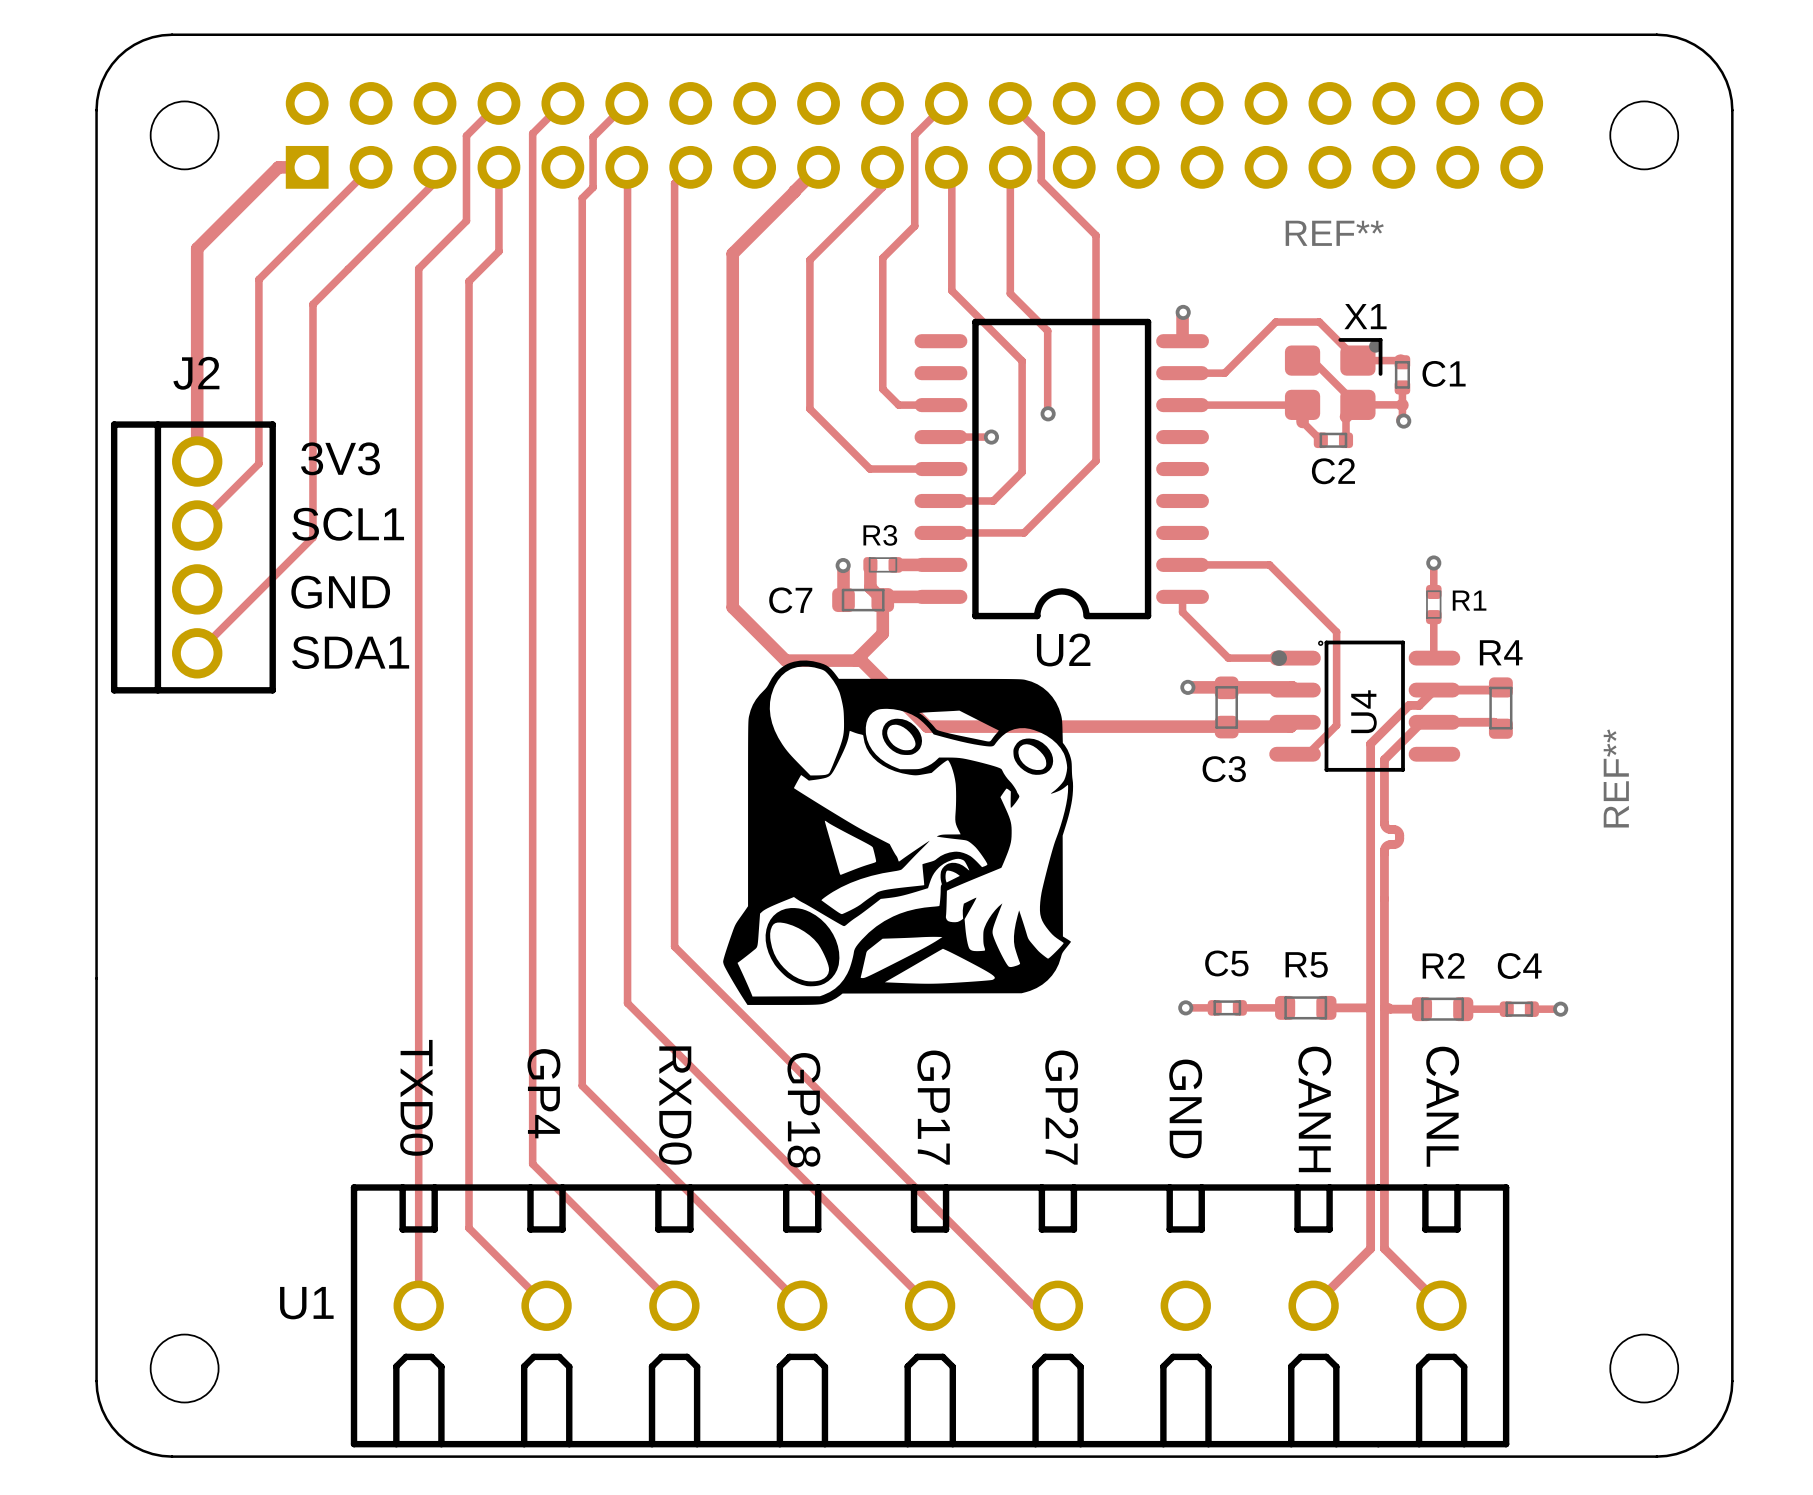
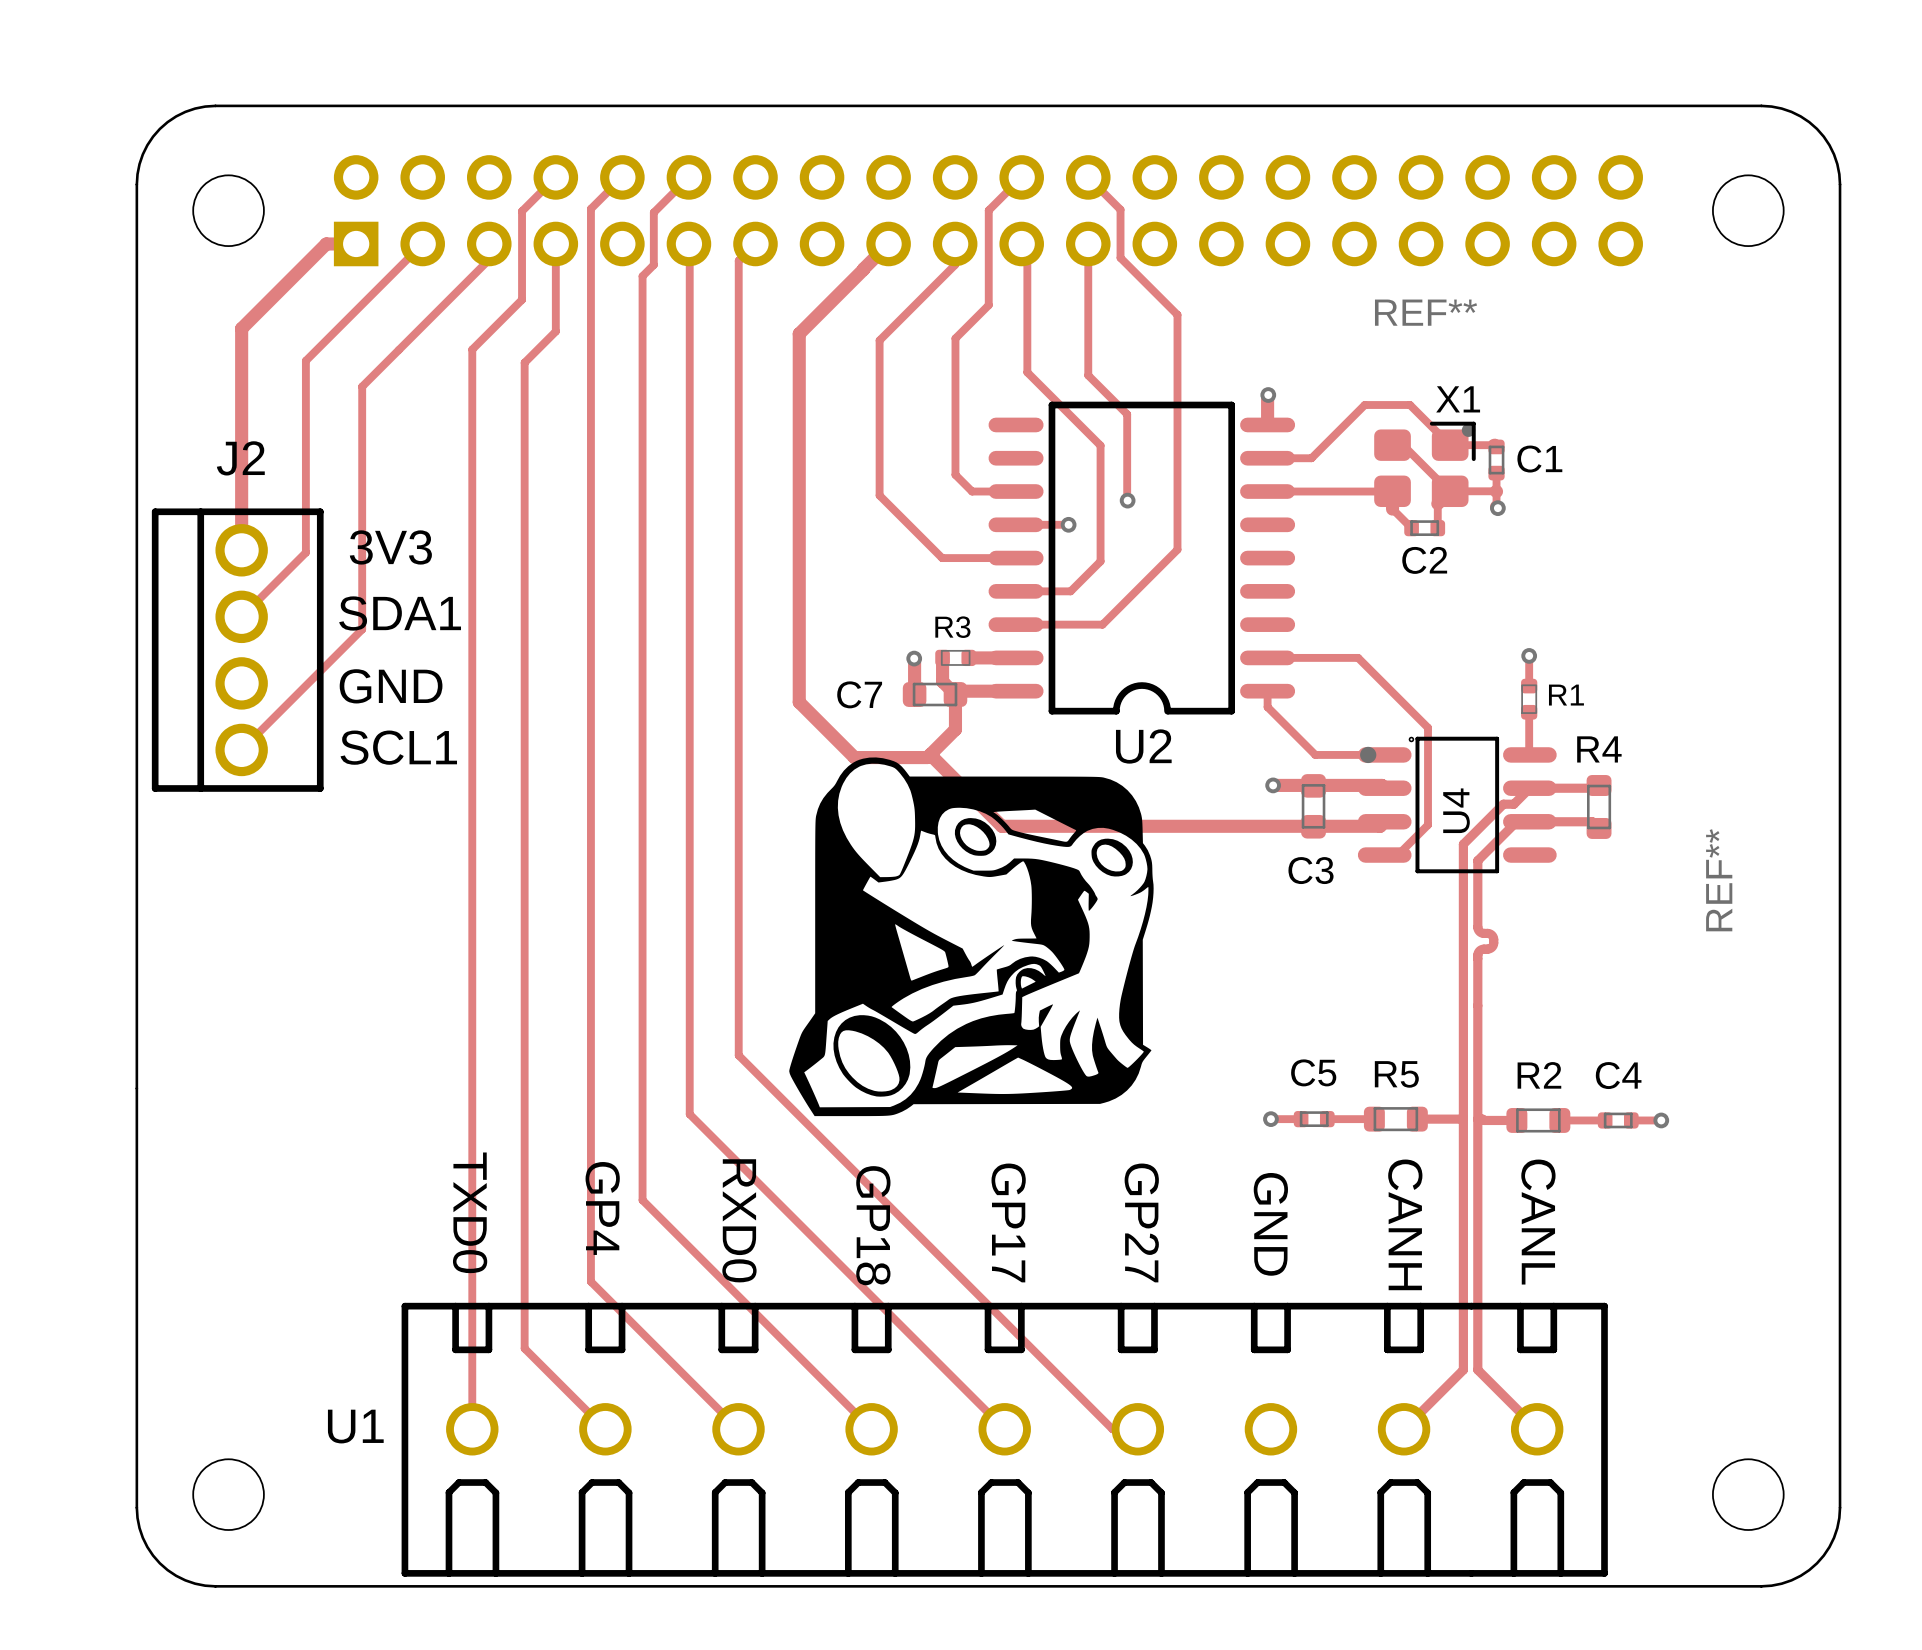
text: SCL1 (348, 524) -> SDA1 (400, 613)
text: SDA1 (350, 652) -> SCL1 (398, 747)

